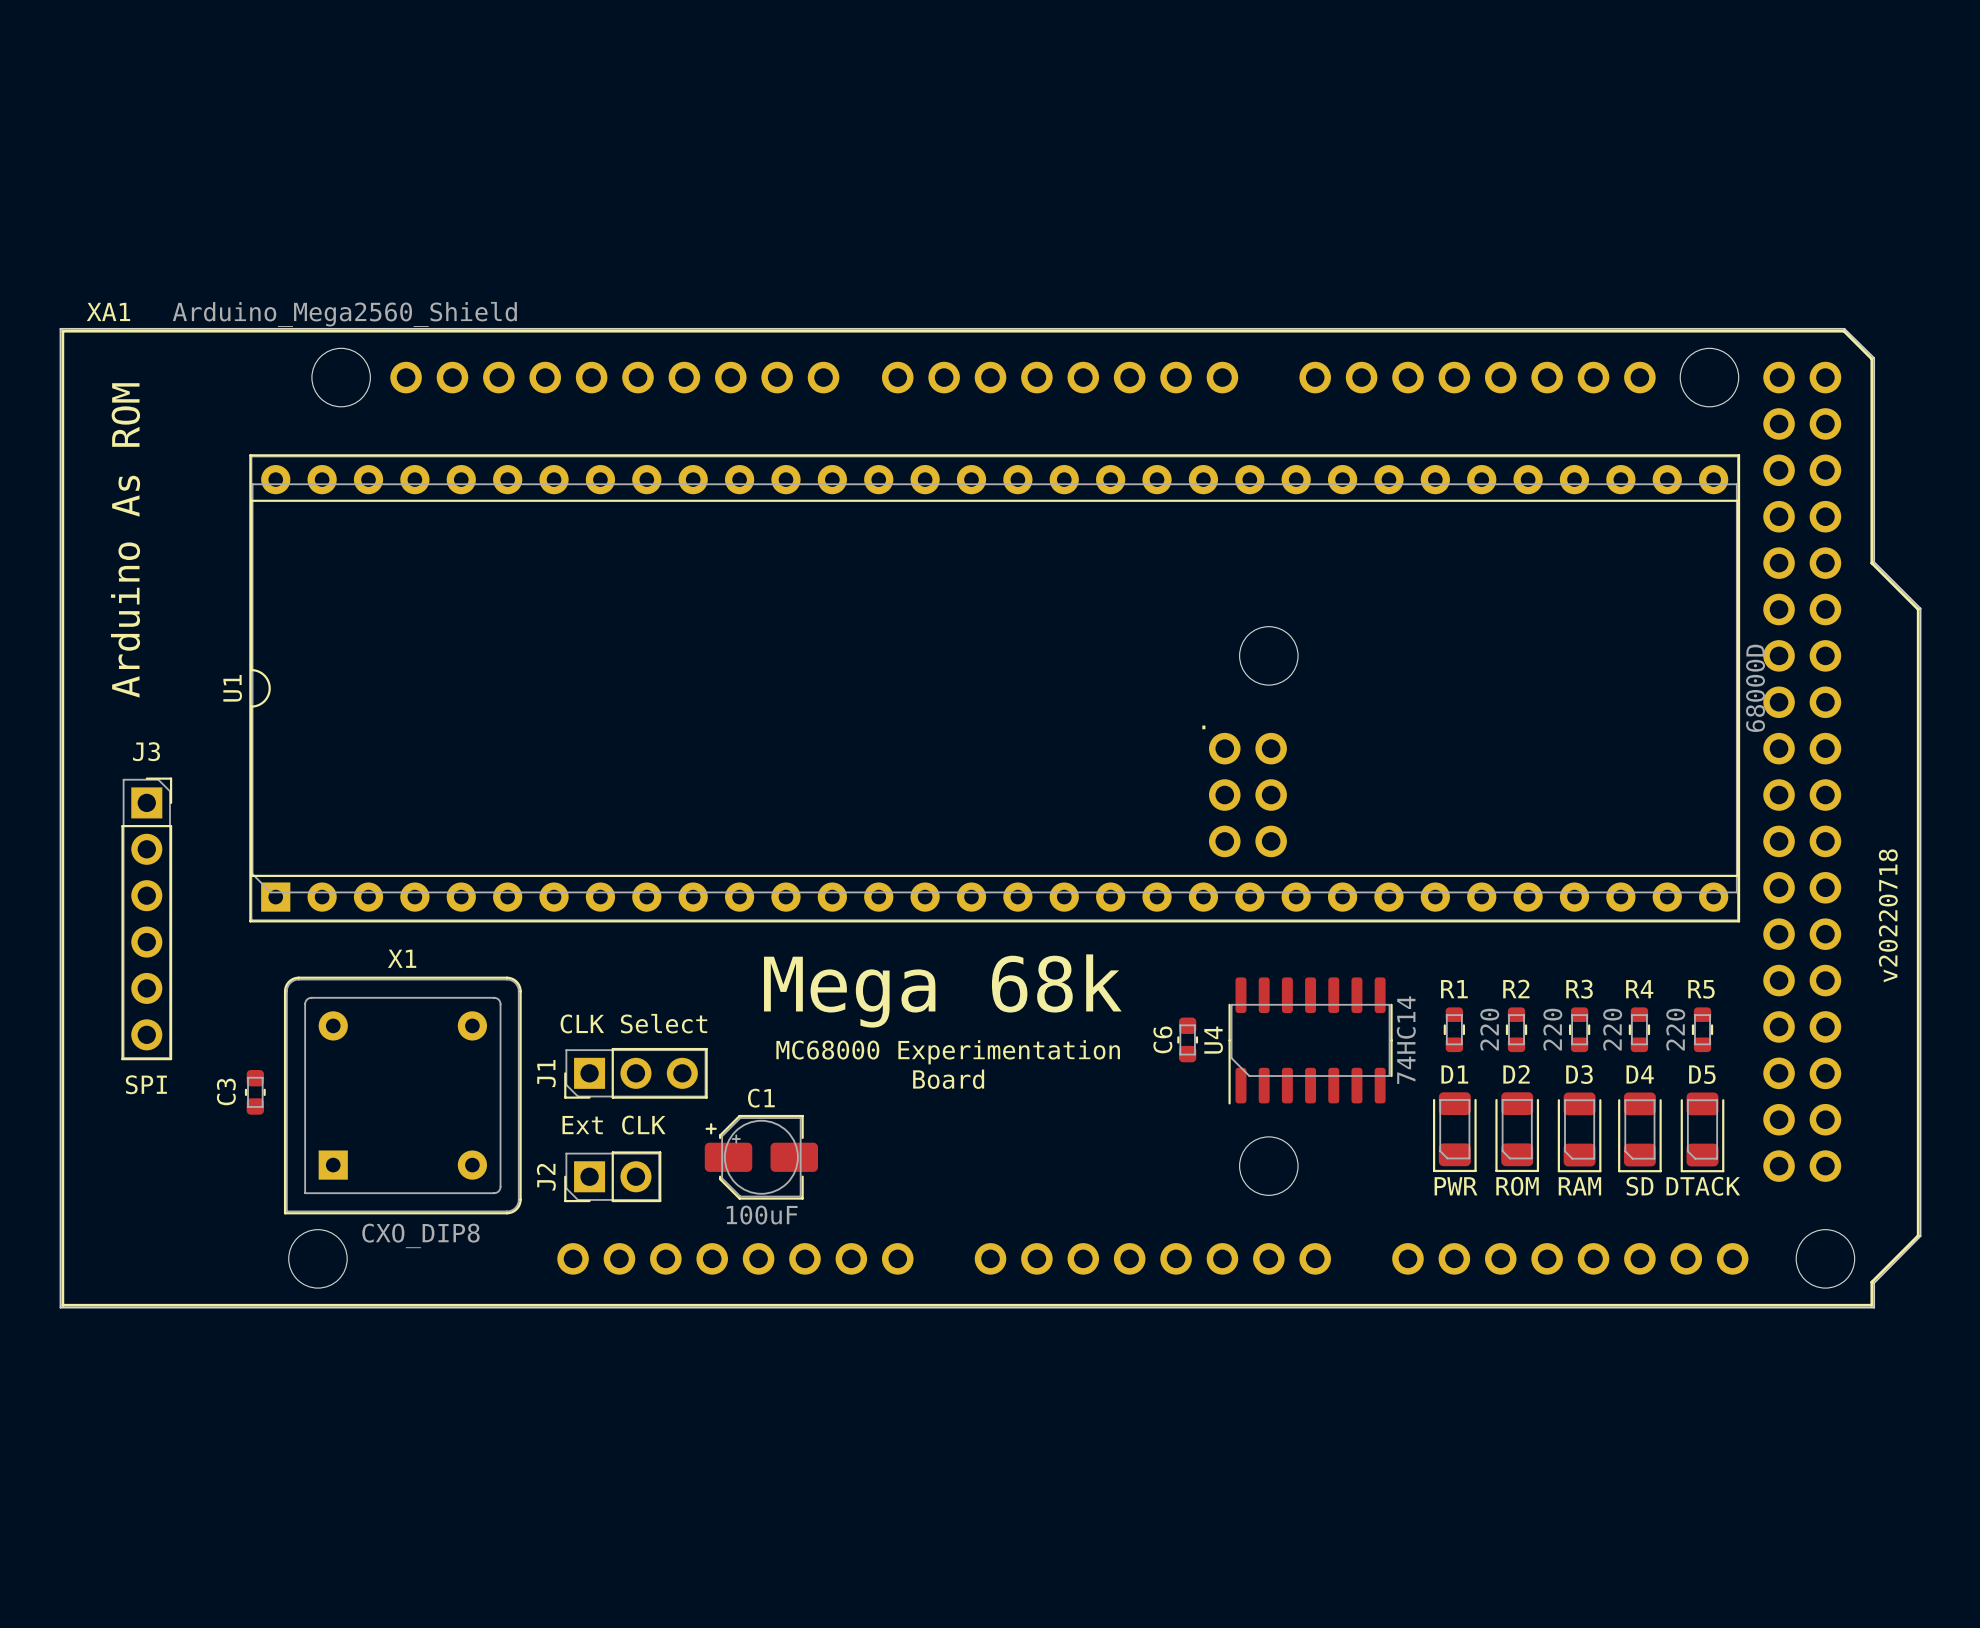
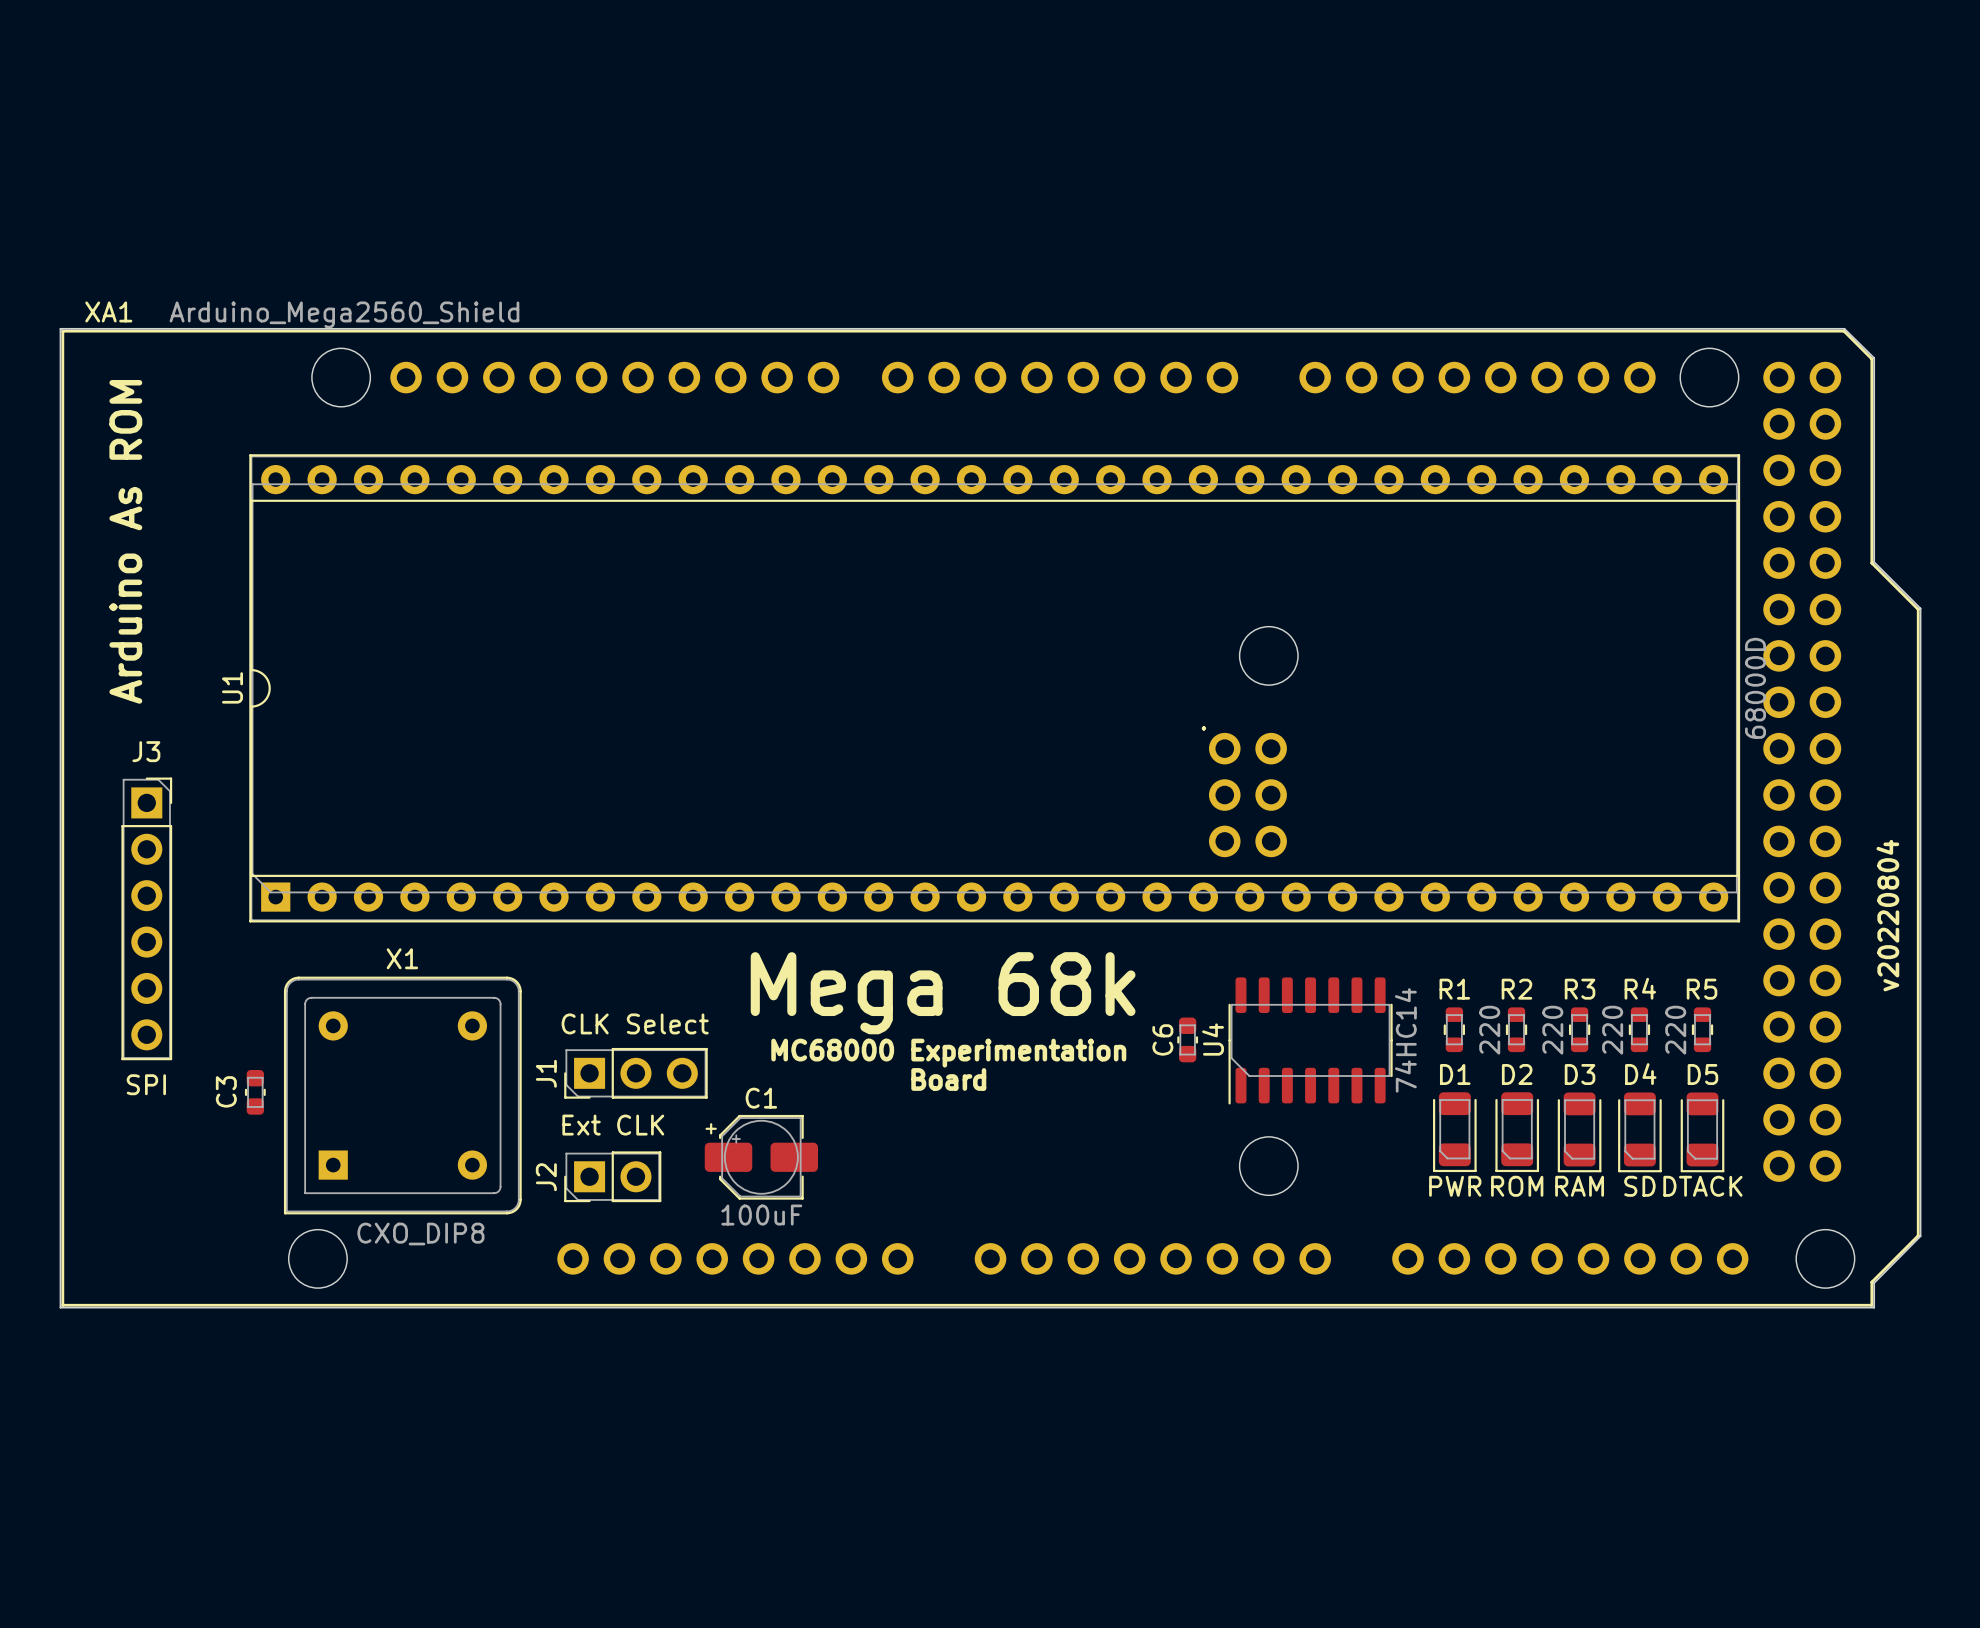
text: v20220718 (1888, 915) -> v20220804 (1887, 915)

